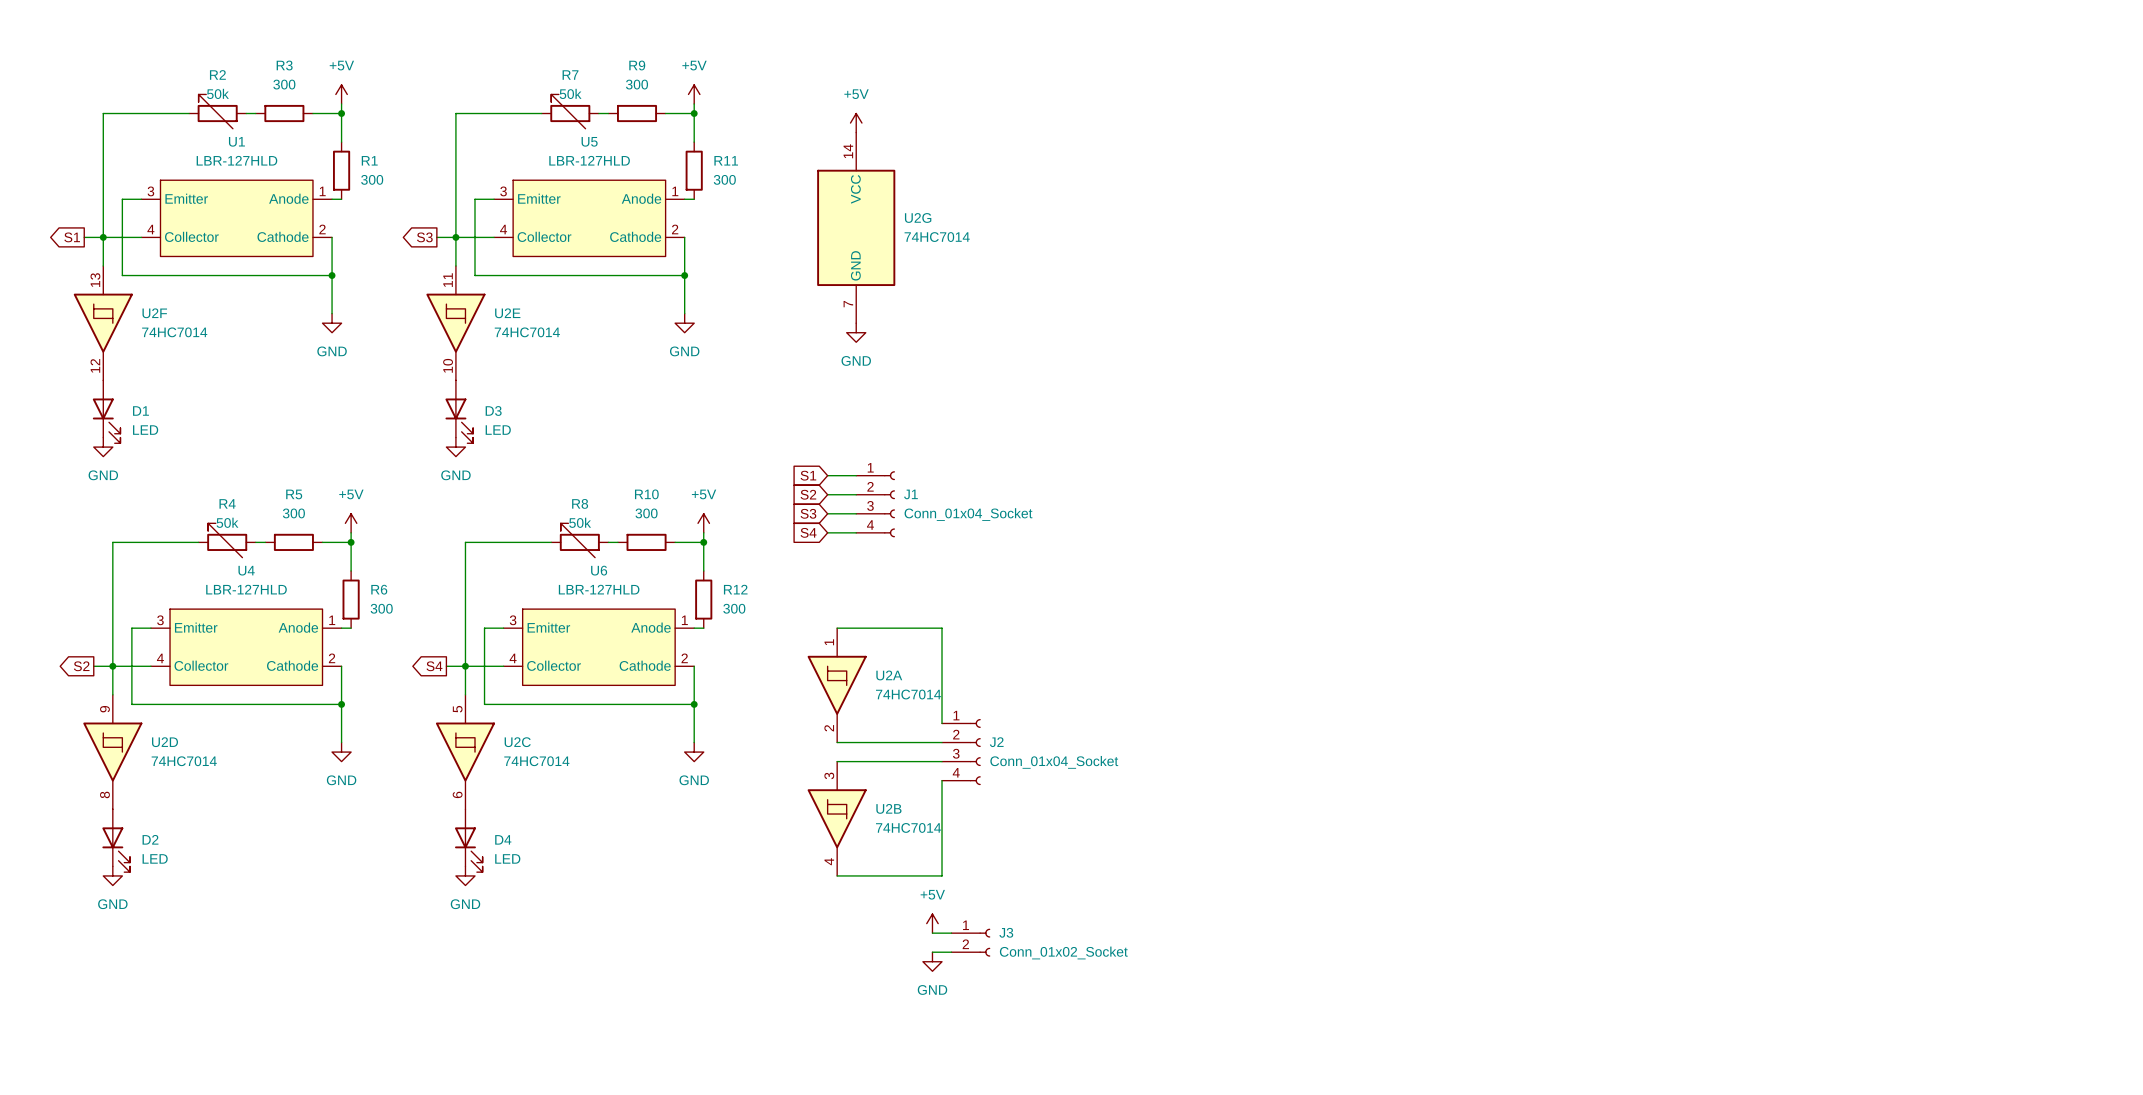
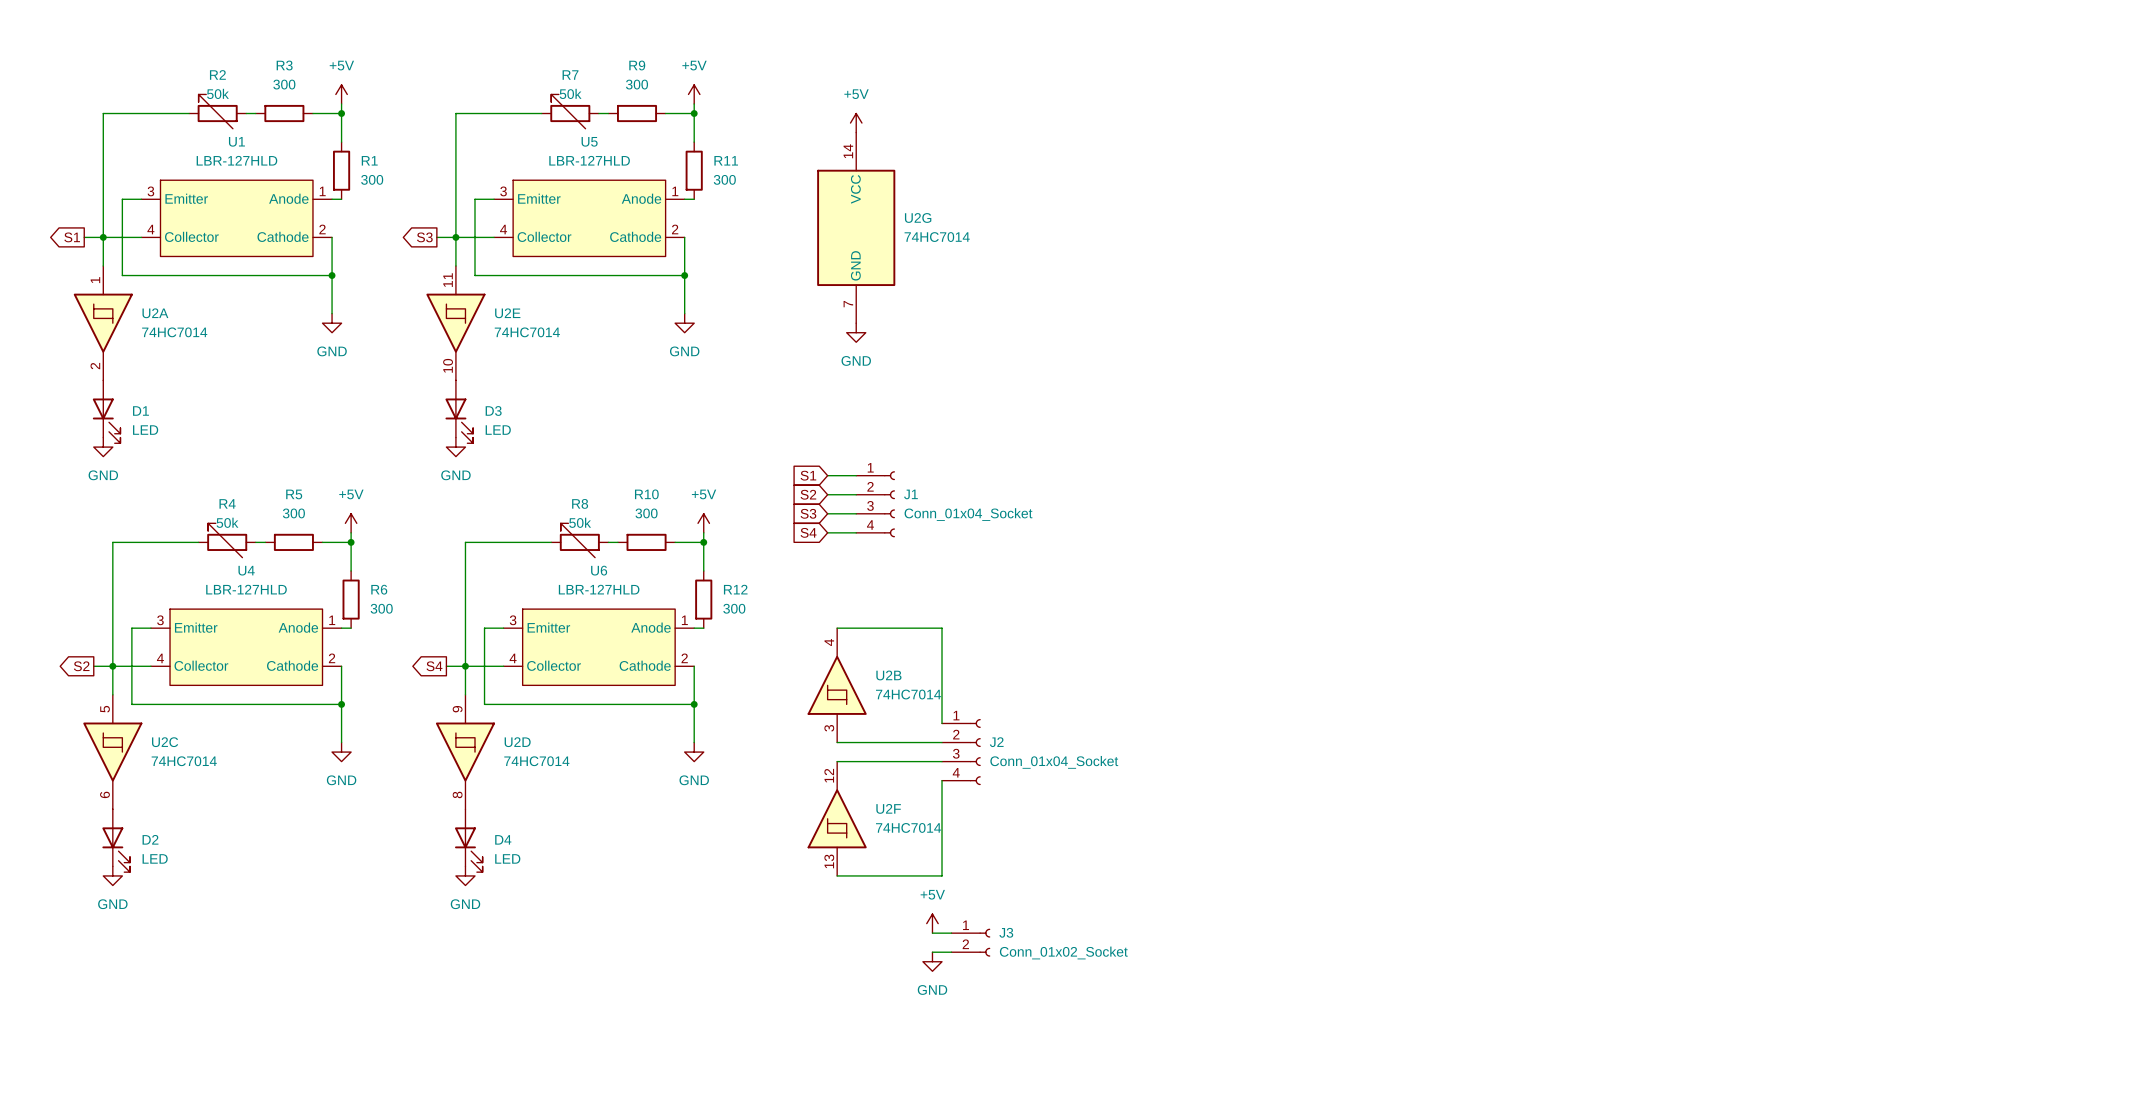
U2F rotation: 0° (103, 323) -> 180° (837, 818)
U2F position: (103, 323) -> (837, 818)
U2A position: (837, 685) -> (103, 323)
U2D position: (112, 752) -> (465, 752)
U2C position: (465, 752) -> (112, 752)
U2B rotation: 0° (837, 818) -> 180° (837, 685)
U2B position: (837, 818) -> (837, 685)

